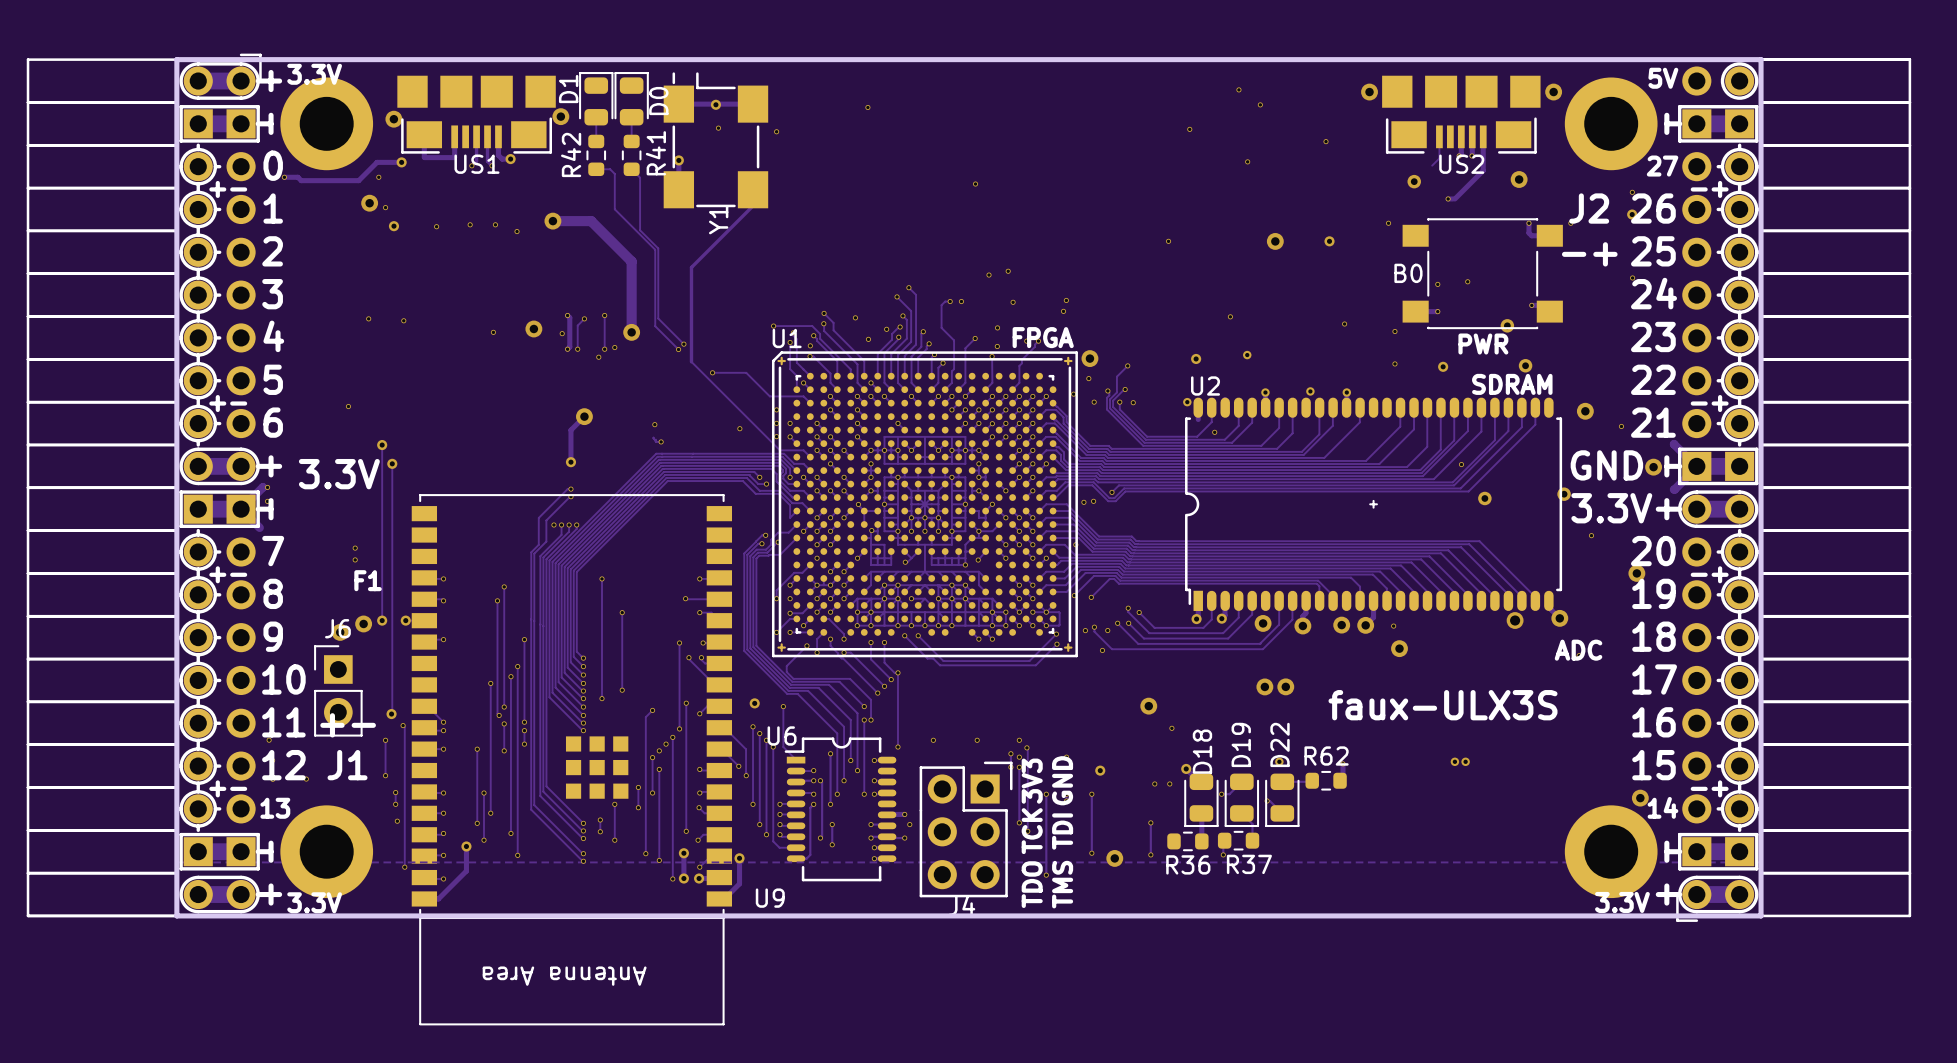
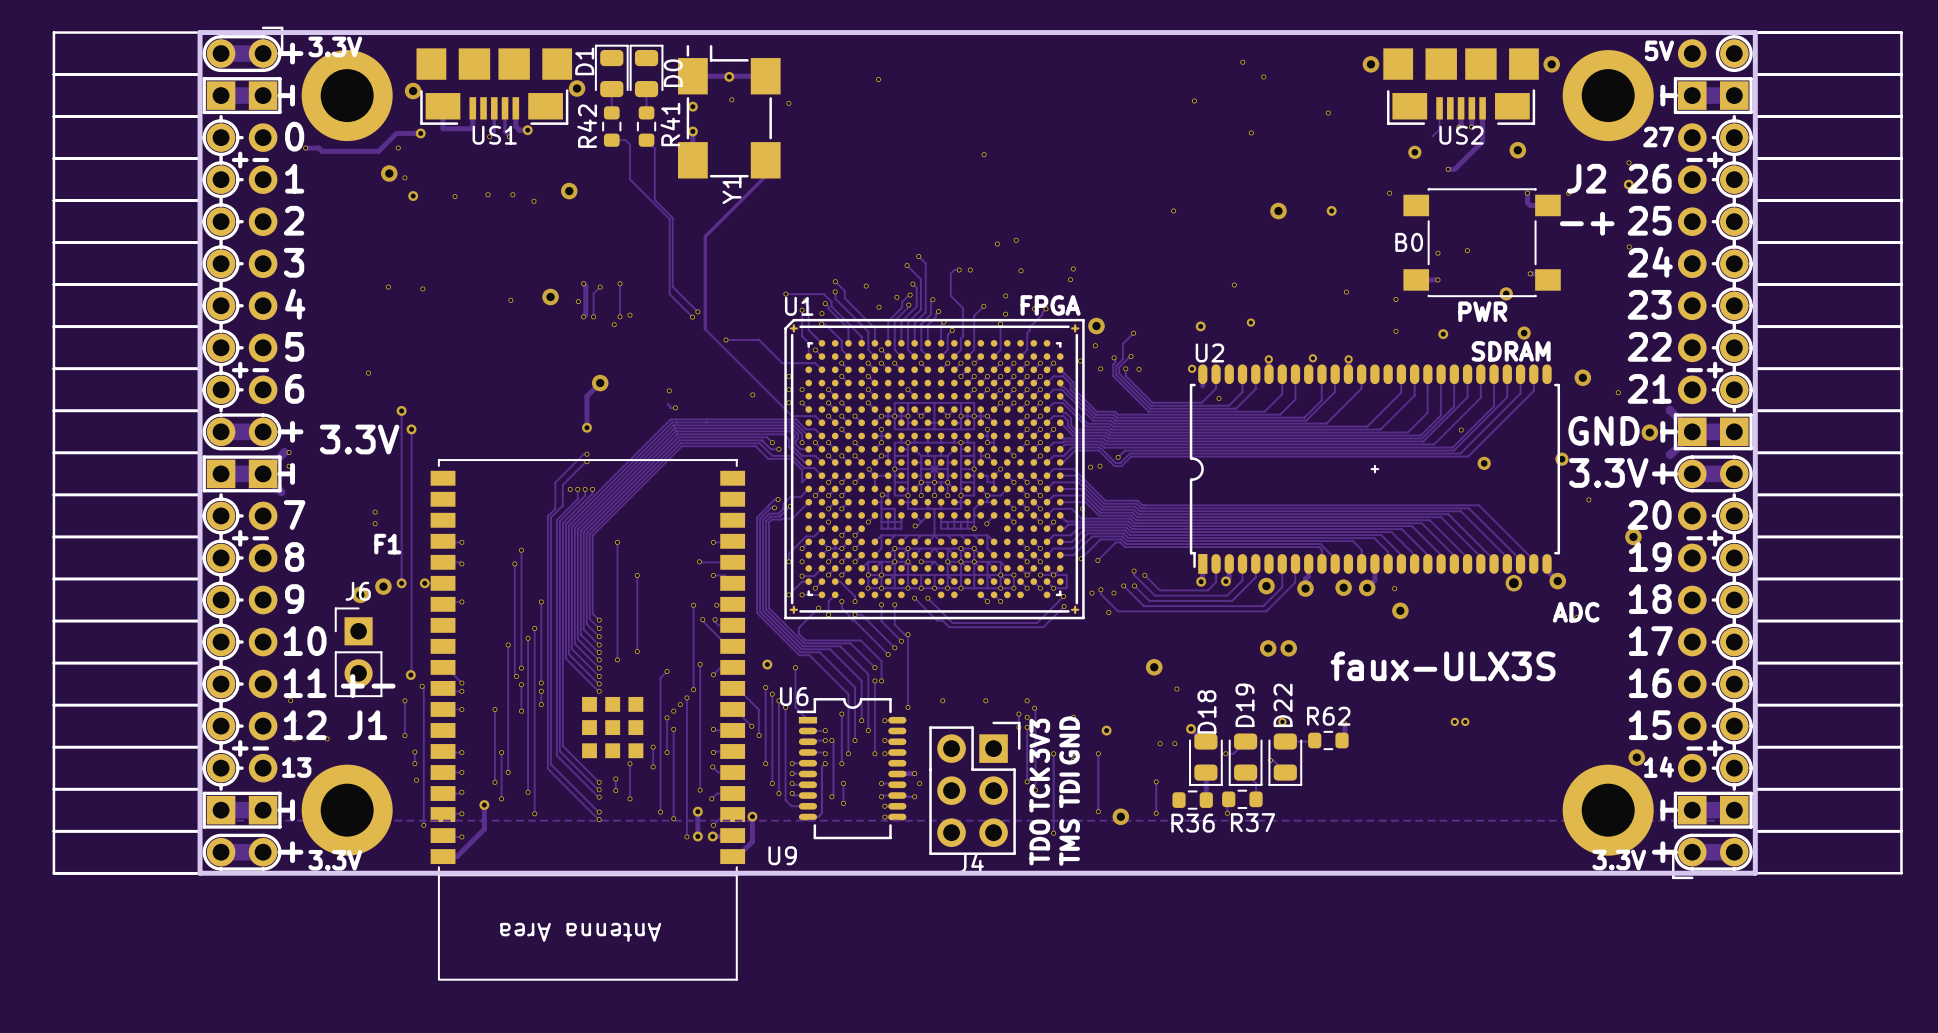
via: none -> (692, 106)
track: (552, 221) (591, 221) (631, 261) (631, 332) -> none
via: (631, 332) -> none

